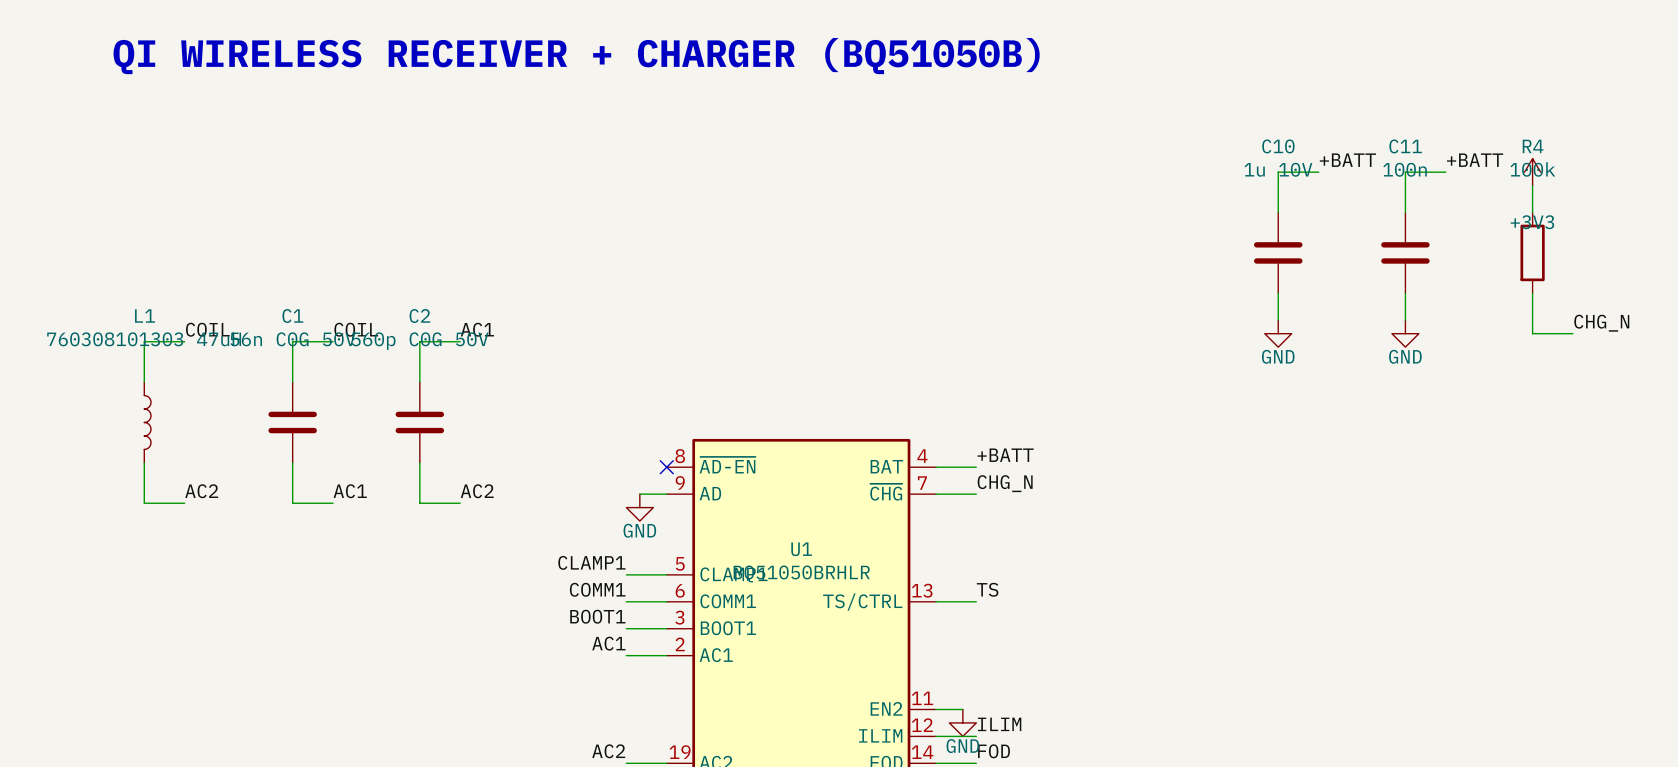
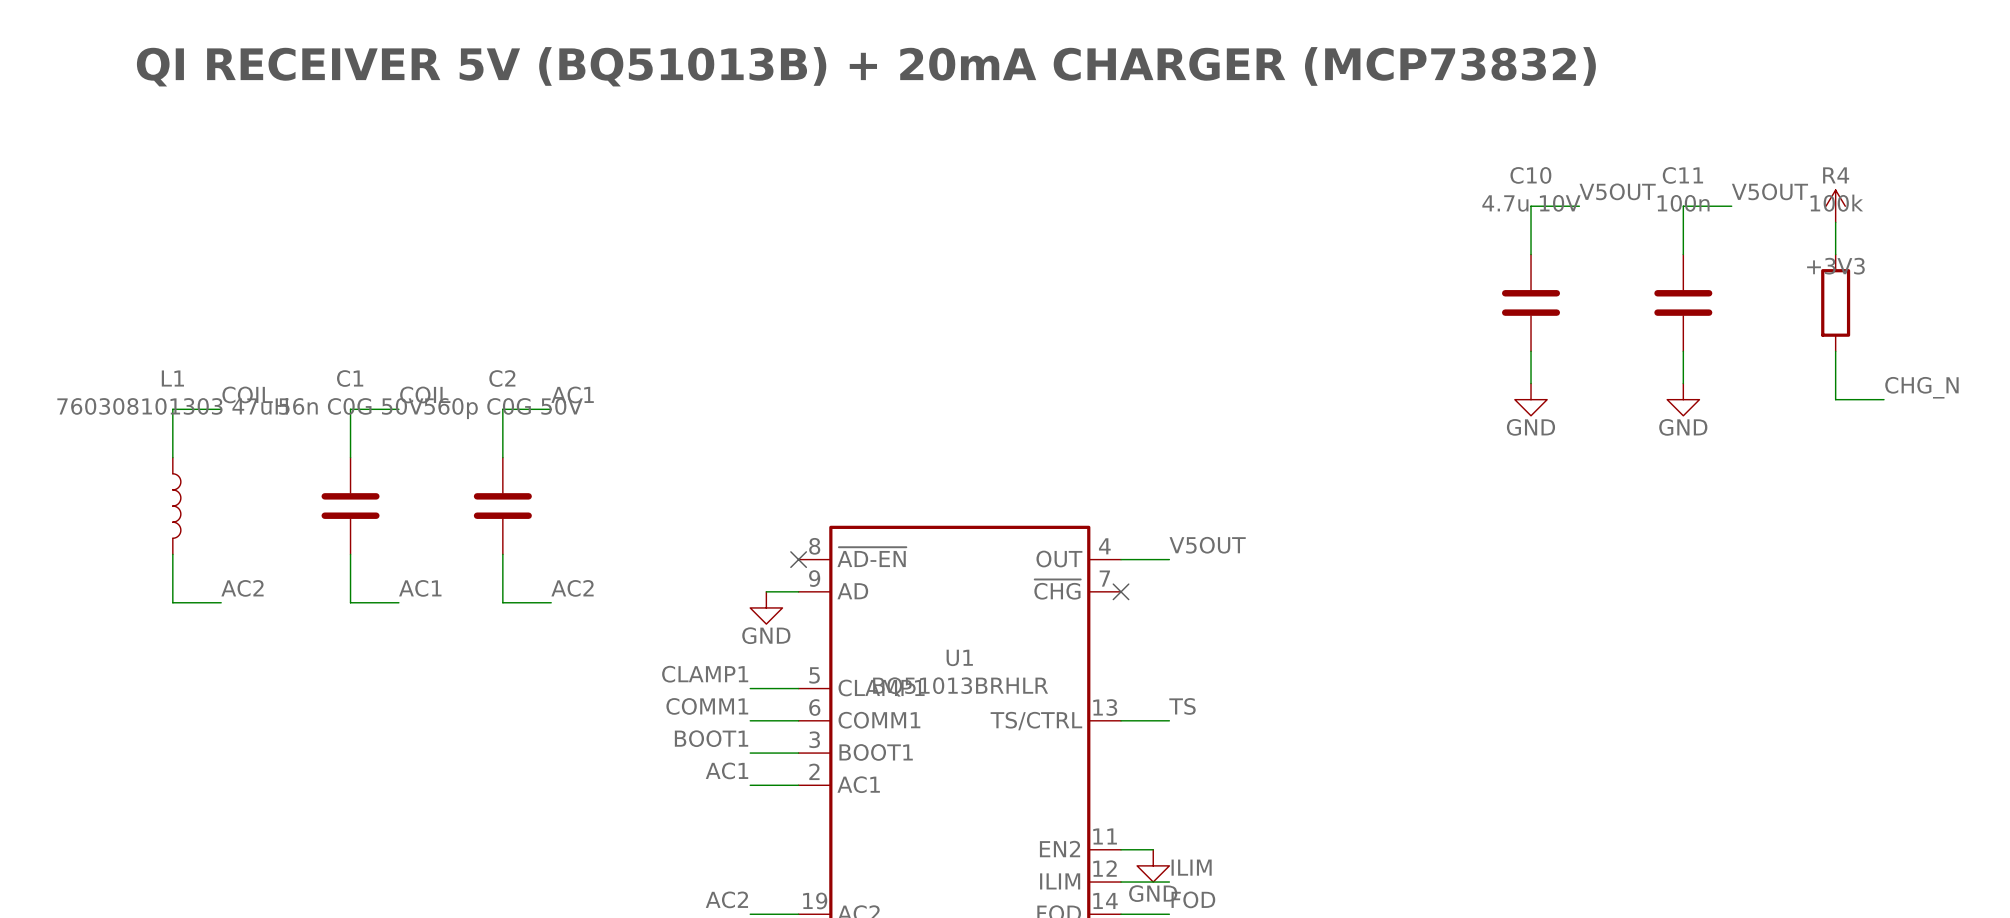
text: QI WIRELESS RECEIVER + CHARGER (BQ51050B) (576, 56) -> QI RECEIVER 5V (BQ51013B) + 20mA CHARGER (MCP73832) (866, 66)
label: +BATT (1347, 160) -> V5OUT (1617, 191)
label: +BATT (1475, 160) -> V5OUT (1769, 191)
C10 value: 1u 10V (1278, 169) -> 4.7u 10V (1531, 203)
label: +BATT (1005, 455) -> V5OUT (1207, 545)
U1 pin name: BAT (886, 466) -> OUT (1059, 559)
label: CHG_N (1005, 483) -> none
wire: (935, 494) (976, 494) -> none
no-connect mark: none -> (1121, 591)
U1 value: BQ51050BRHLR (801, 573) -> BQ51013BRHLR (960, 686)

